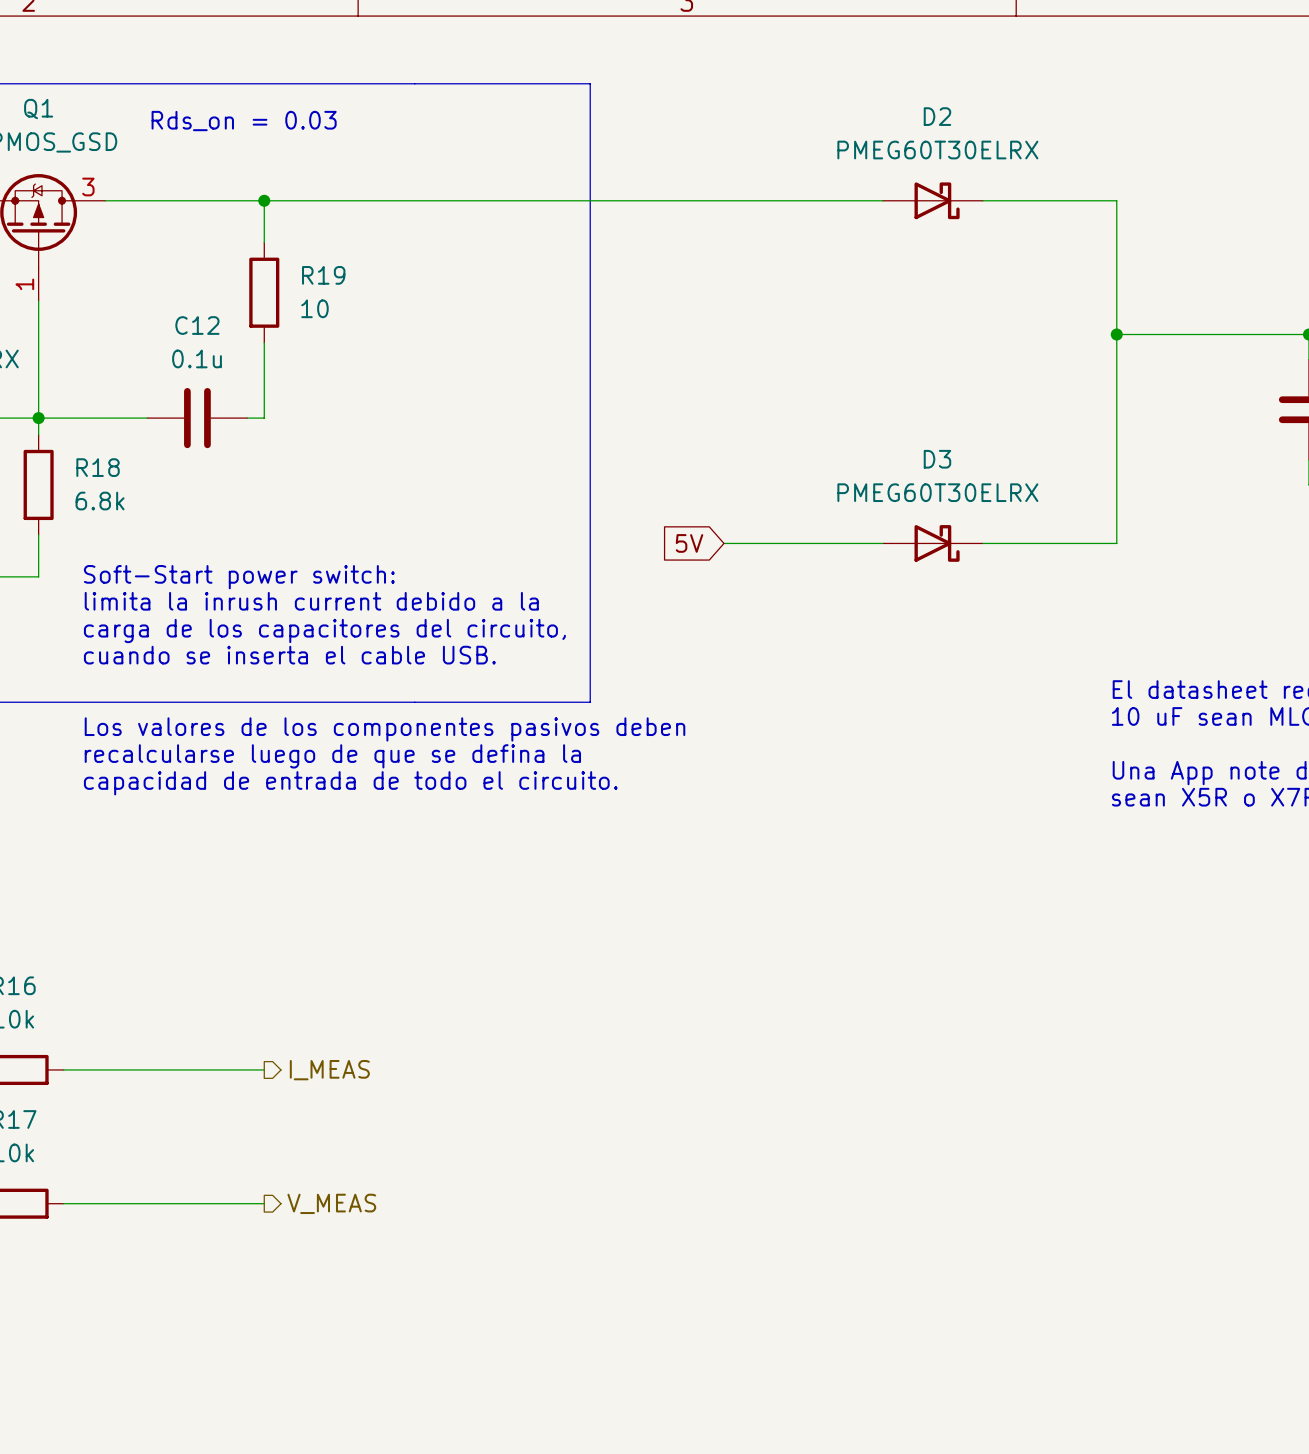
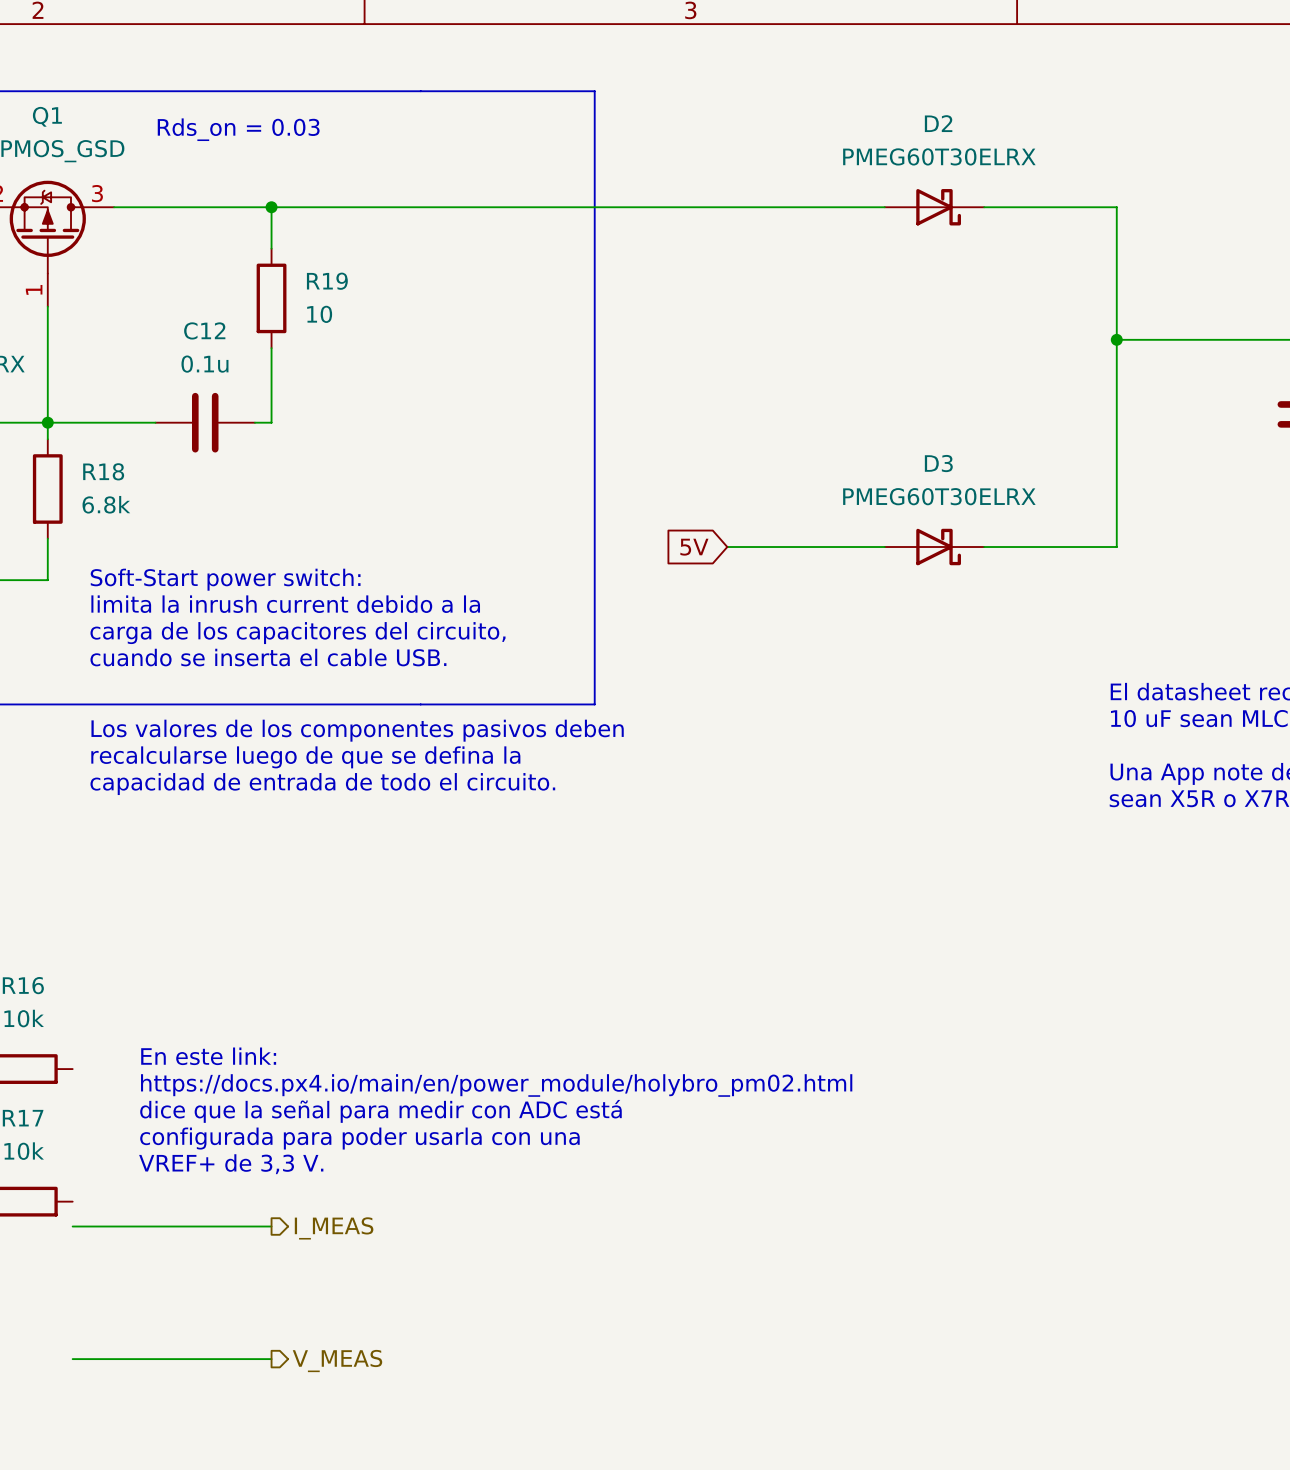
text: none -> En este link: (208, 1056)
wire: (63, 1069) (264, 1069) -> (72, 1226) (271, 1226)
hierarchical label position: I_MEAS (329, 1070) -> I_MEAS (334, 1228)
text: none -> https://docs.px4.io/main/en/power_module/holybro_pm02.html (496, 1085)
text: none -> dice que la señal para medir con ADC está (380, 1111)
text: none -> configurada para poder usarla con una (359, 1138)
text: none -> VREF+ de 3,3 V. (231, 1164)
wire: (63, 1203) (264, 1203) -> (72, 1359) (271, 1359)
hierarchical label position: V_MEAS (331, 1203) -> V_MEAS (337, 1361)

